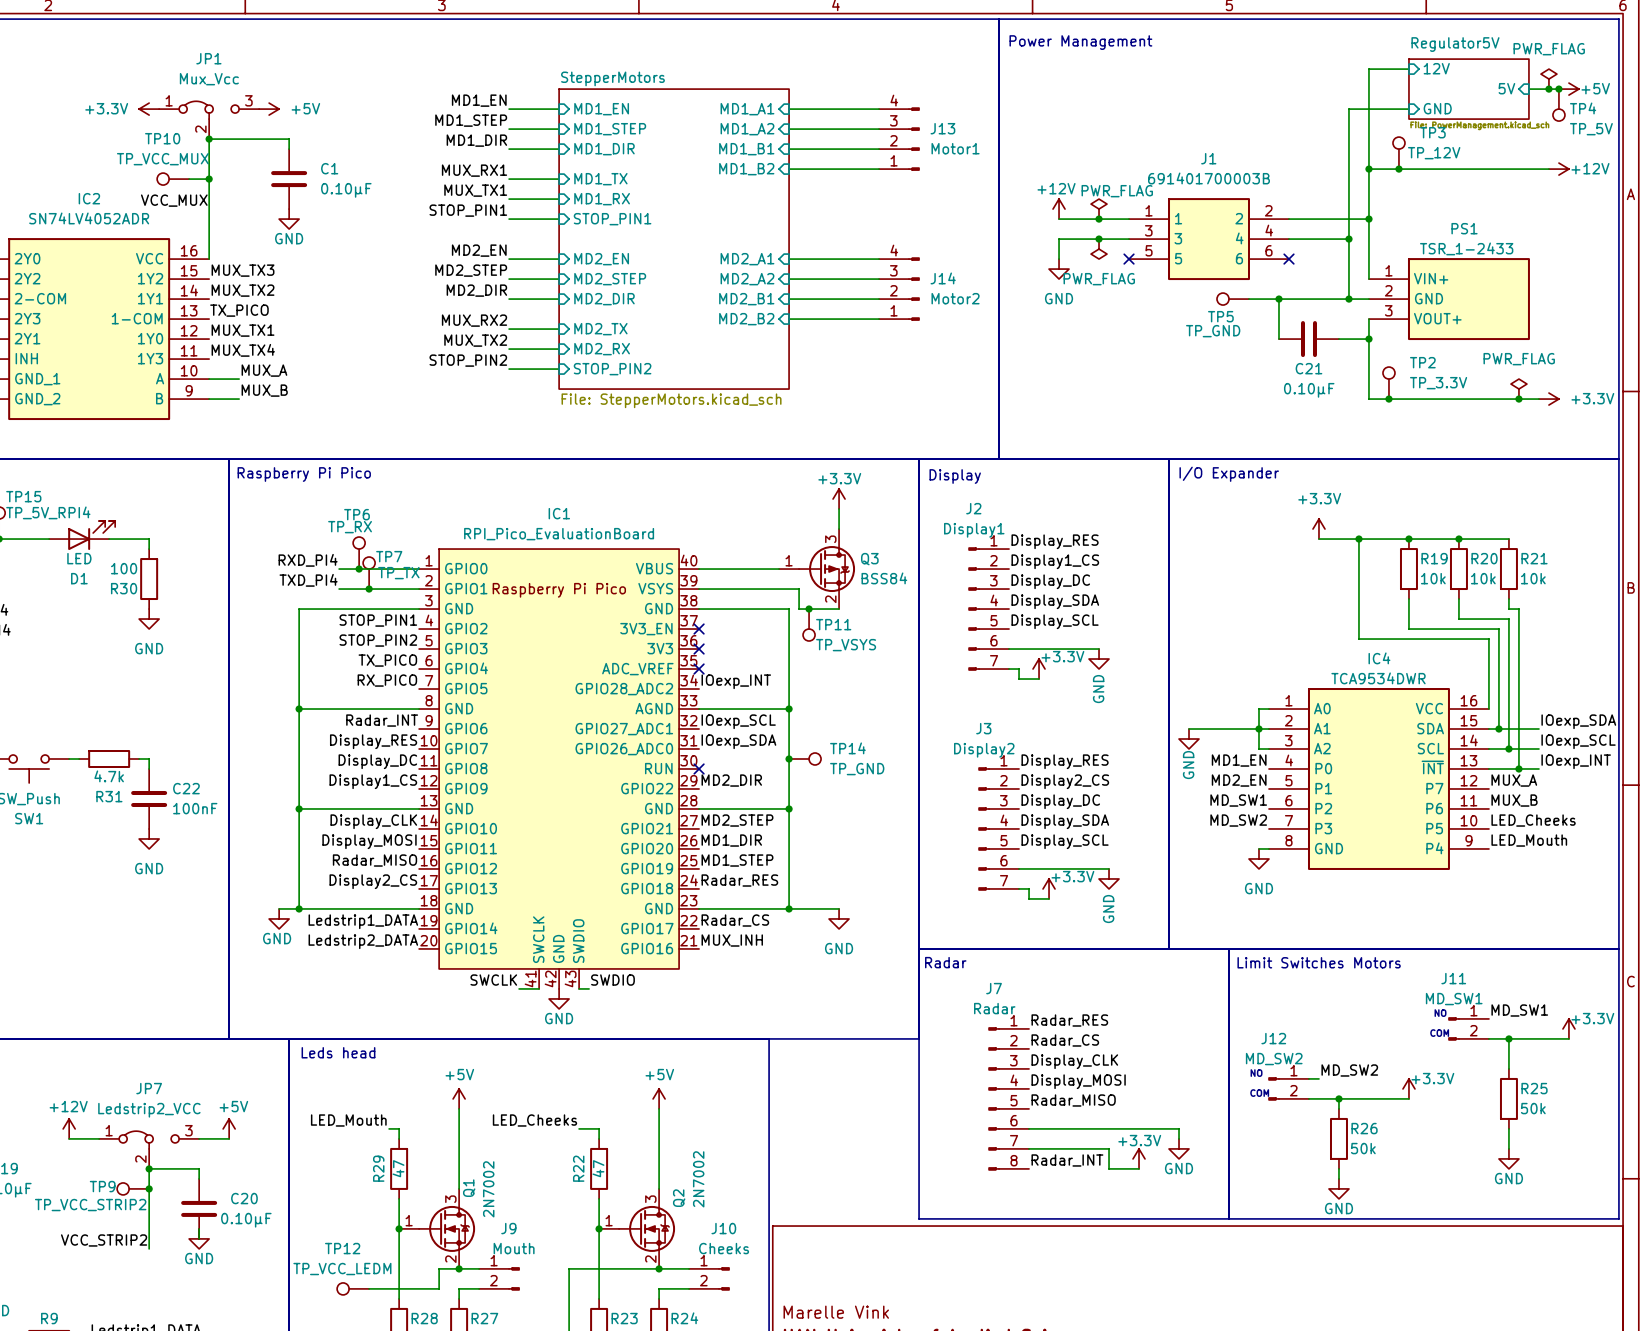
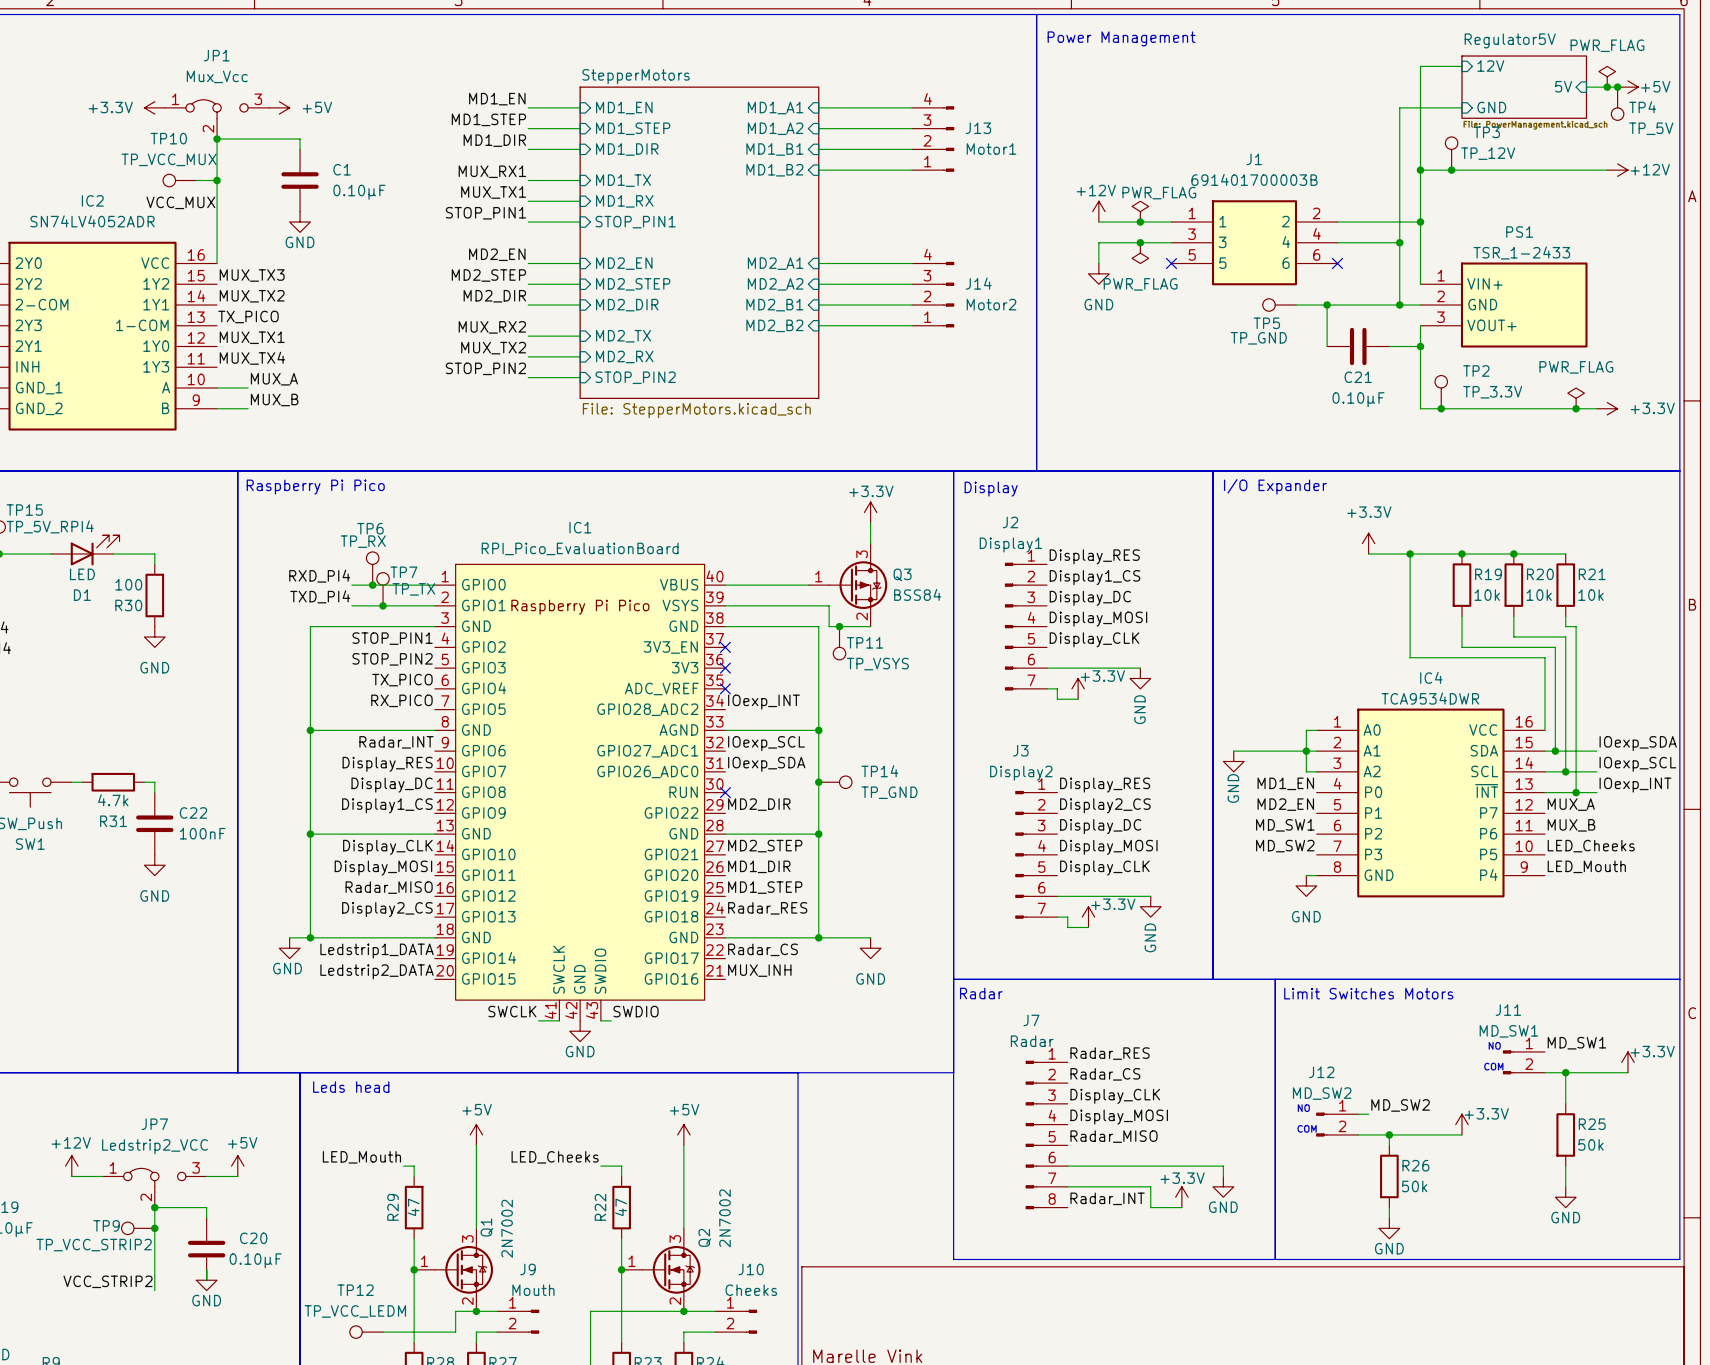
label: Display_SDA (1055, 601) -> Display_MOSI (1098, 619)
label: Display_SCL (1055, 621) -> Display_CLK (1094, 639)
label: Display_SDA (1065, 821) -> Display_MOSI (1108, 847)
label: Display_SCL (1065, 841) -> Display_CLK (1104, 868)

